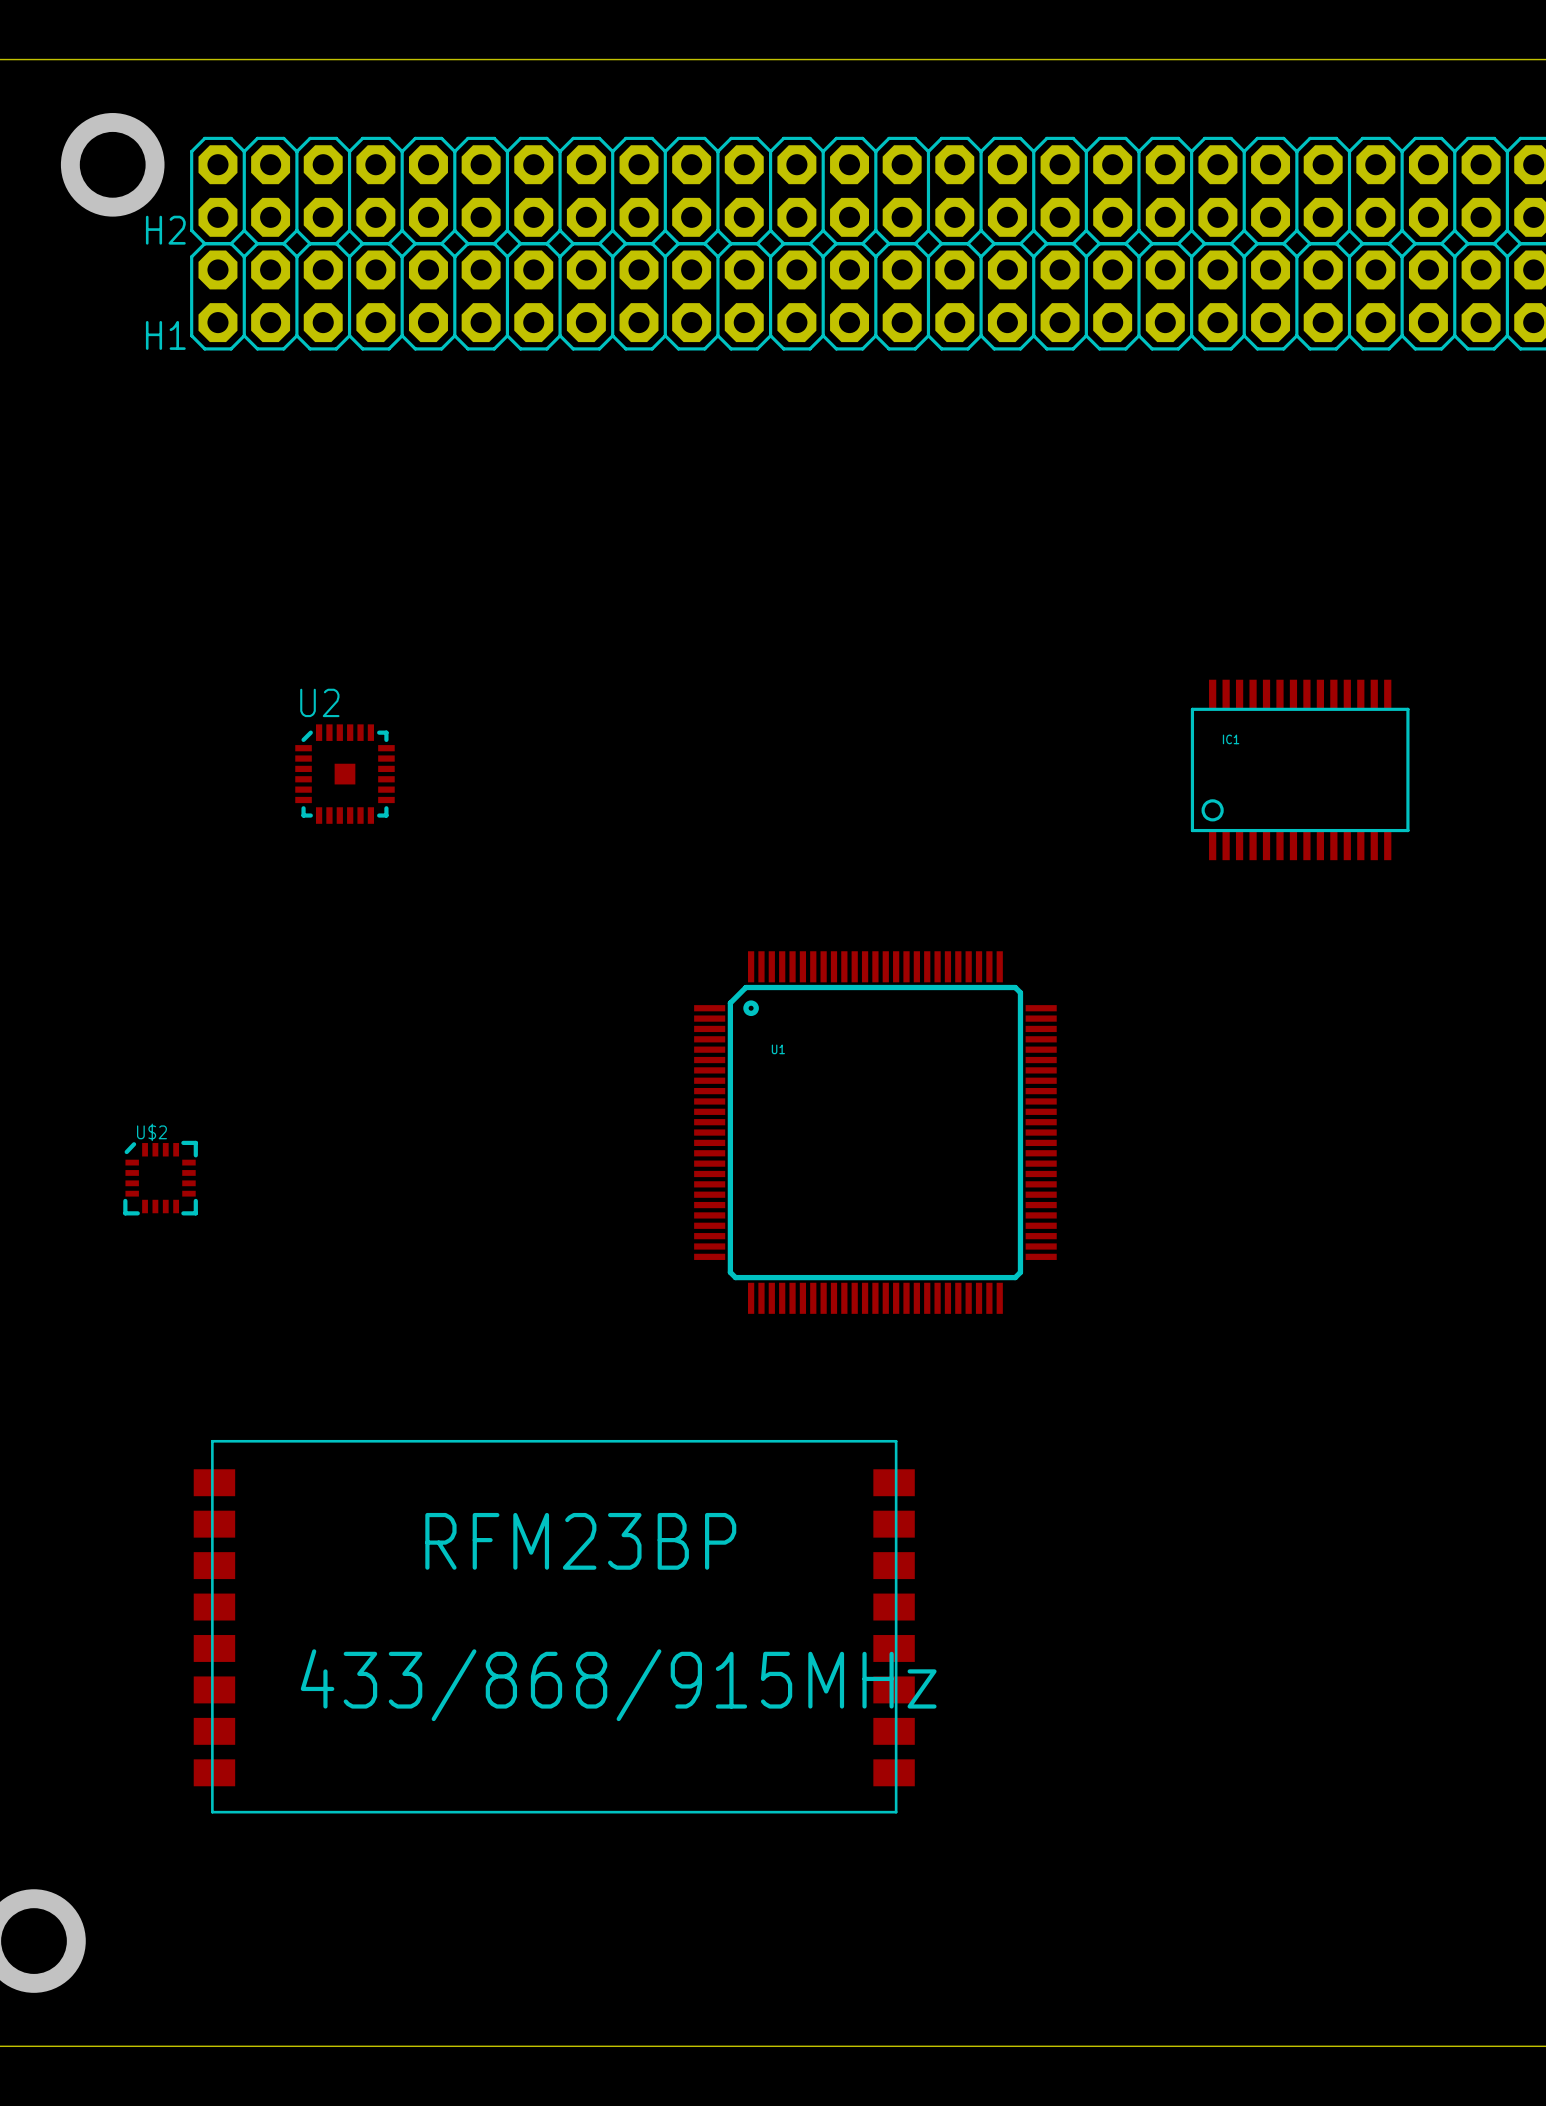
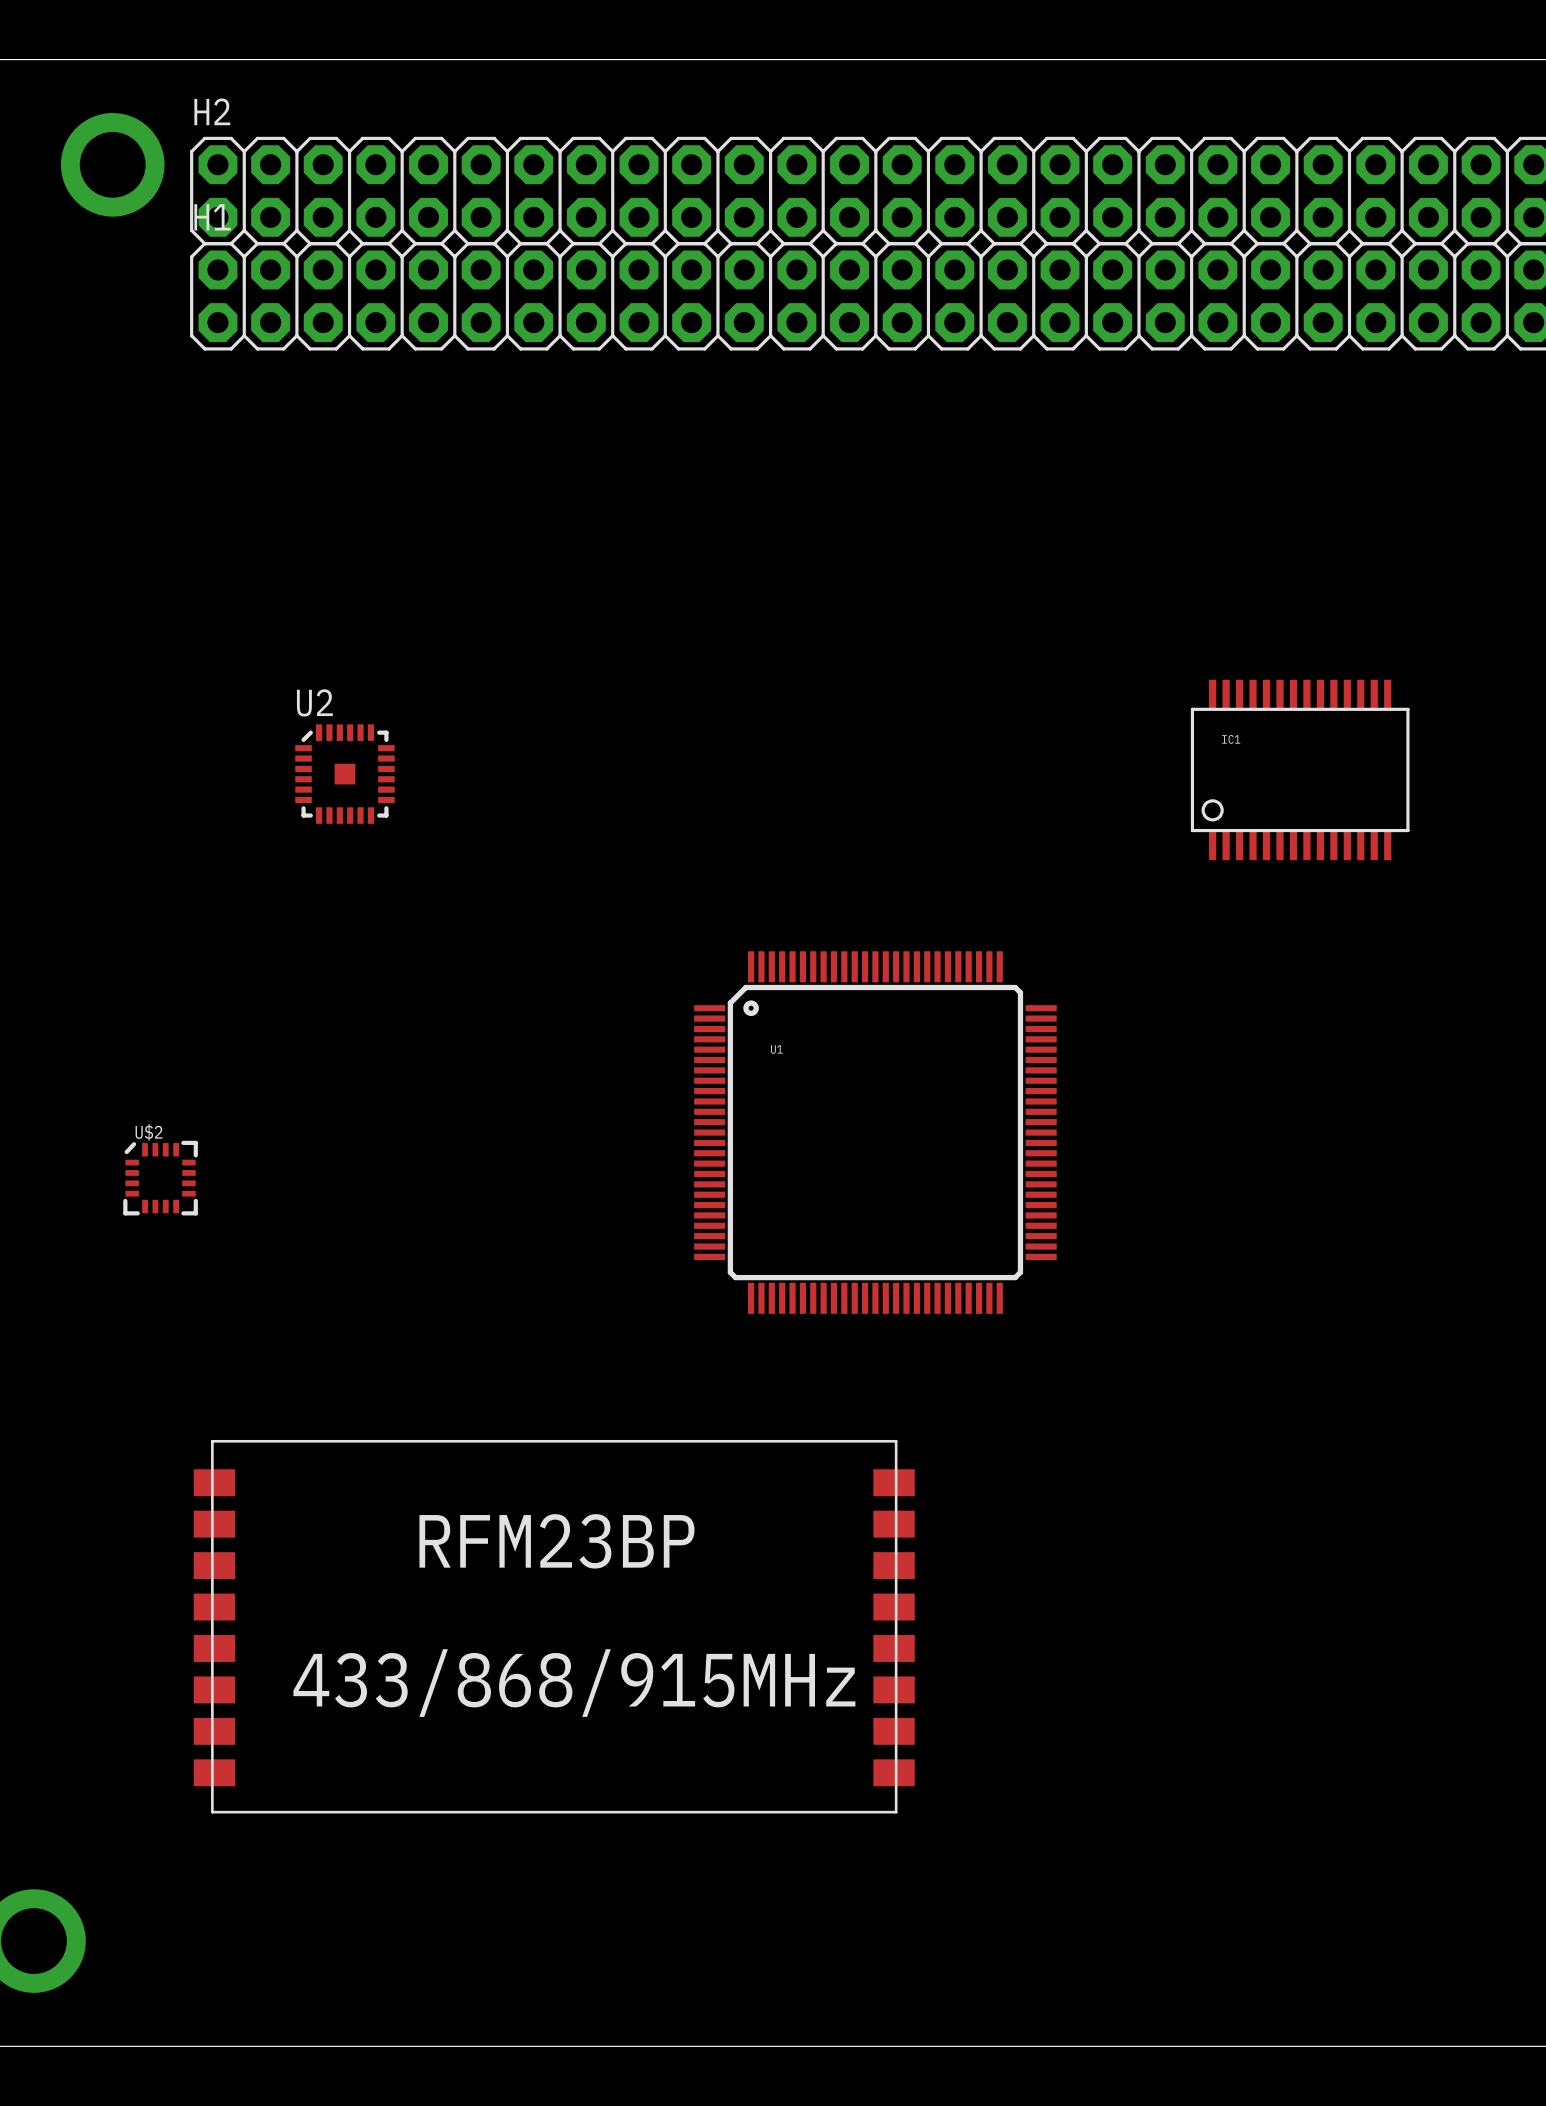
H2 name position: H2 (165, 230) -> H2 (212, 111)
H1 name position: H1 (165, 335) -> H1 (212, 217)

